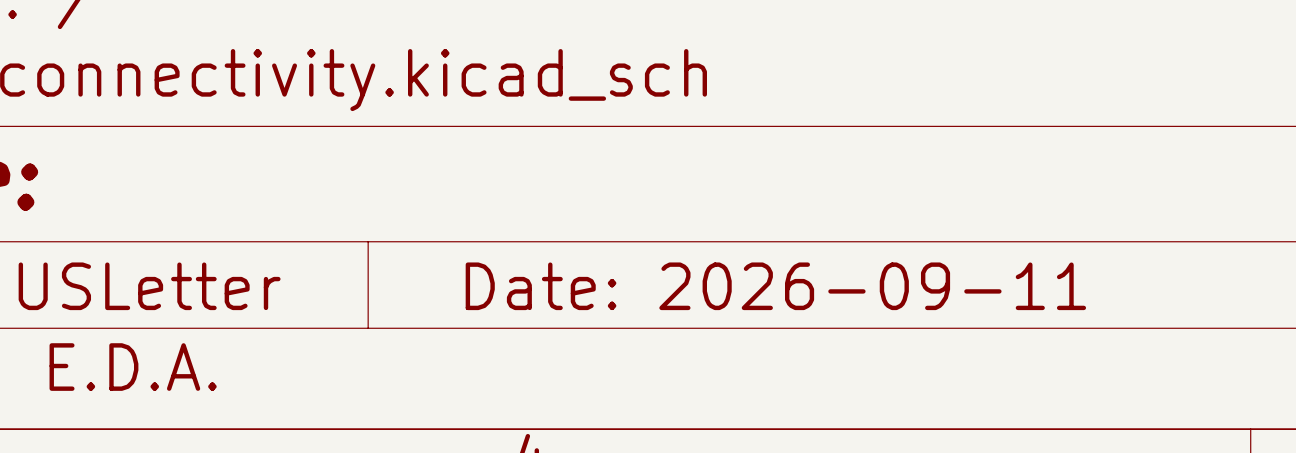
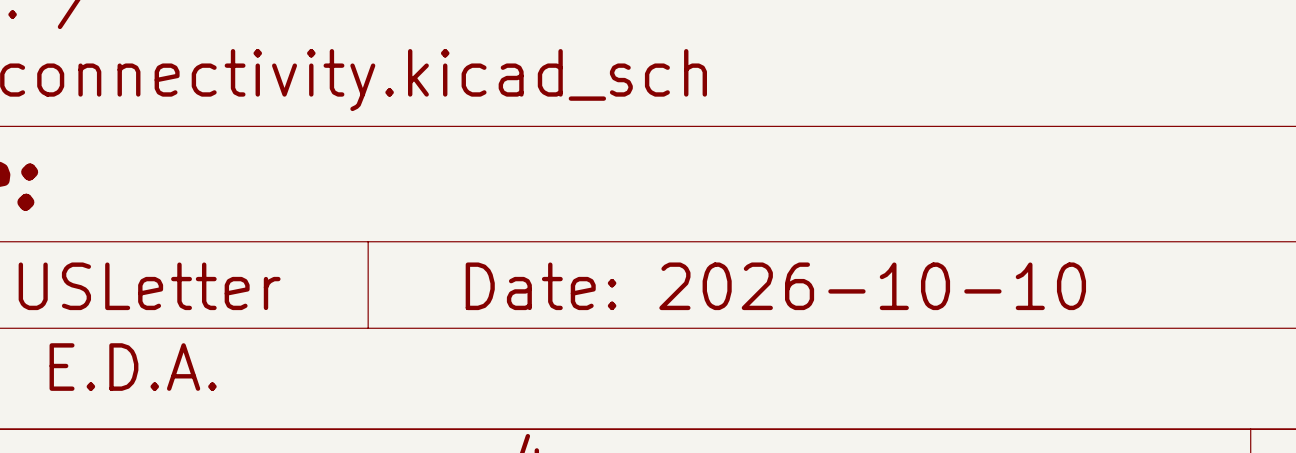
title block: Date: 2026-09-11 (775, 286) -> Date: 2026-10-10 (775, 286)

